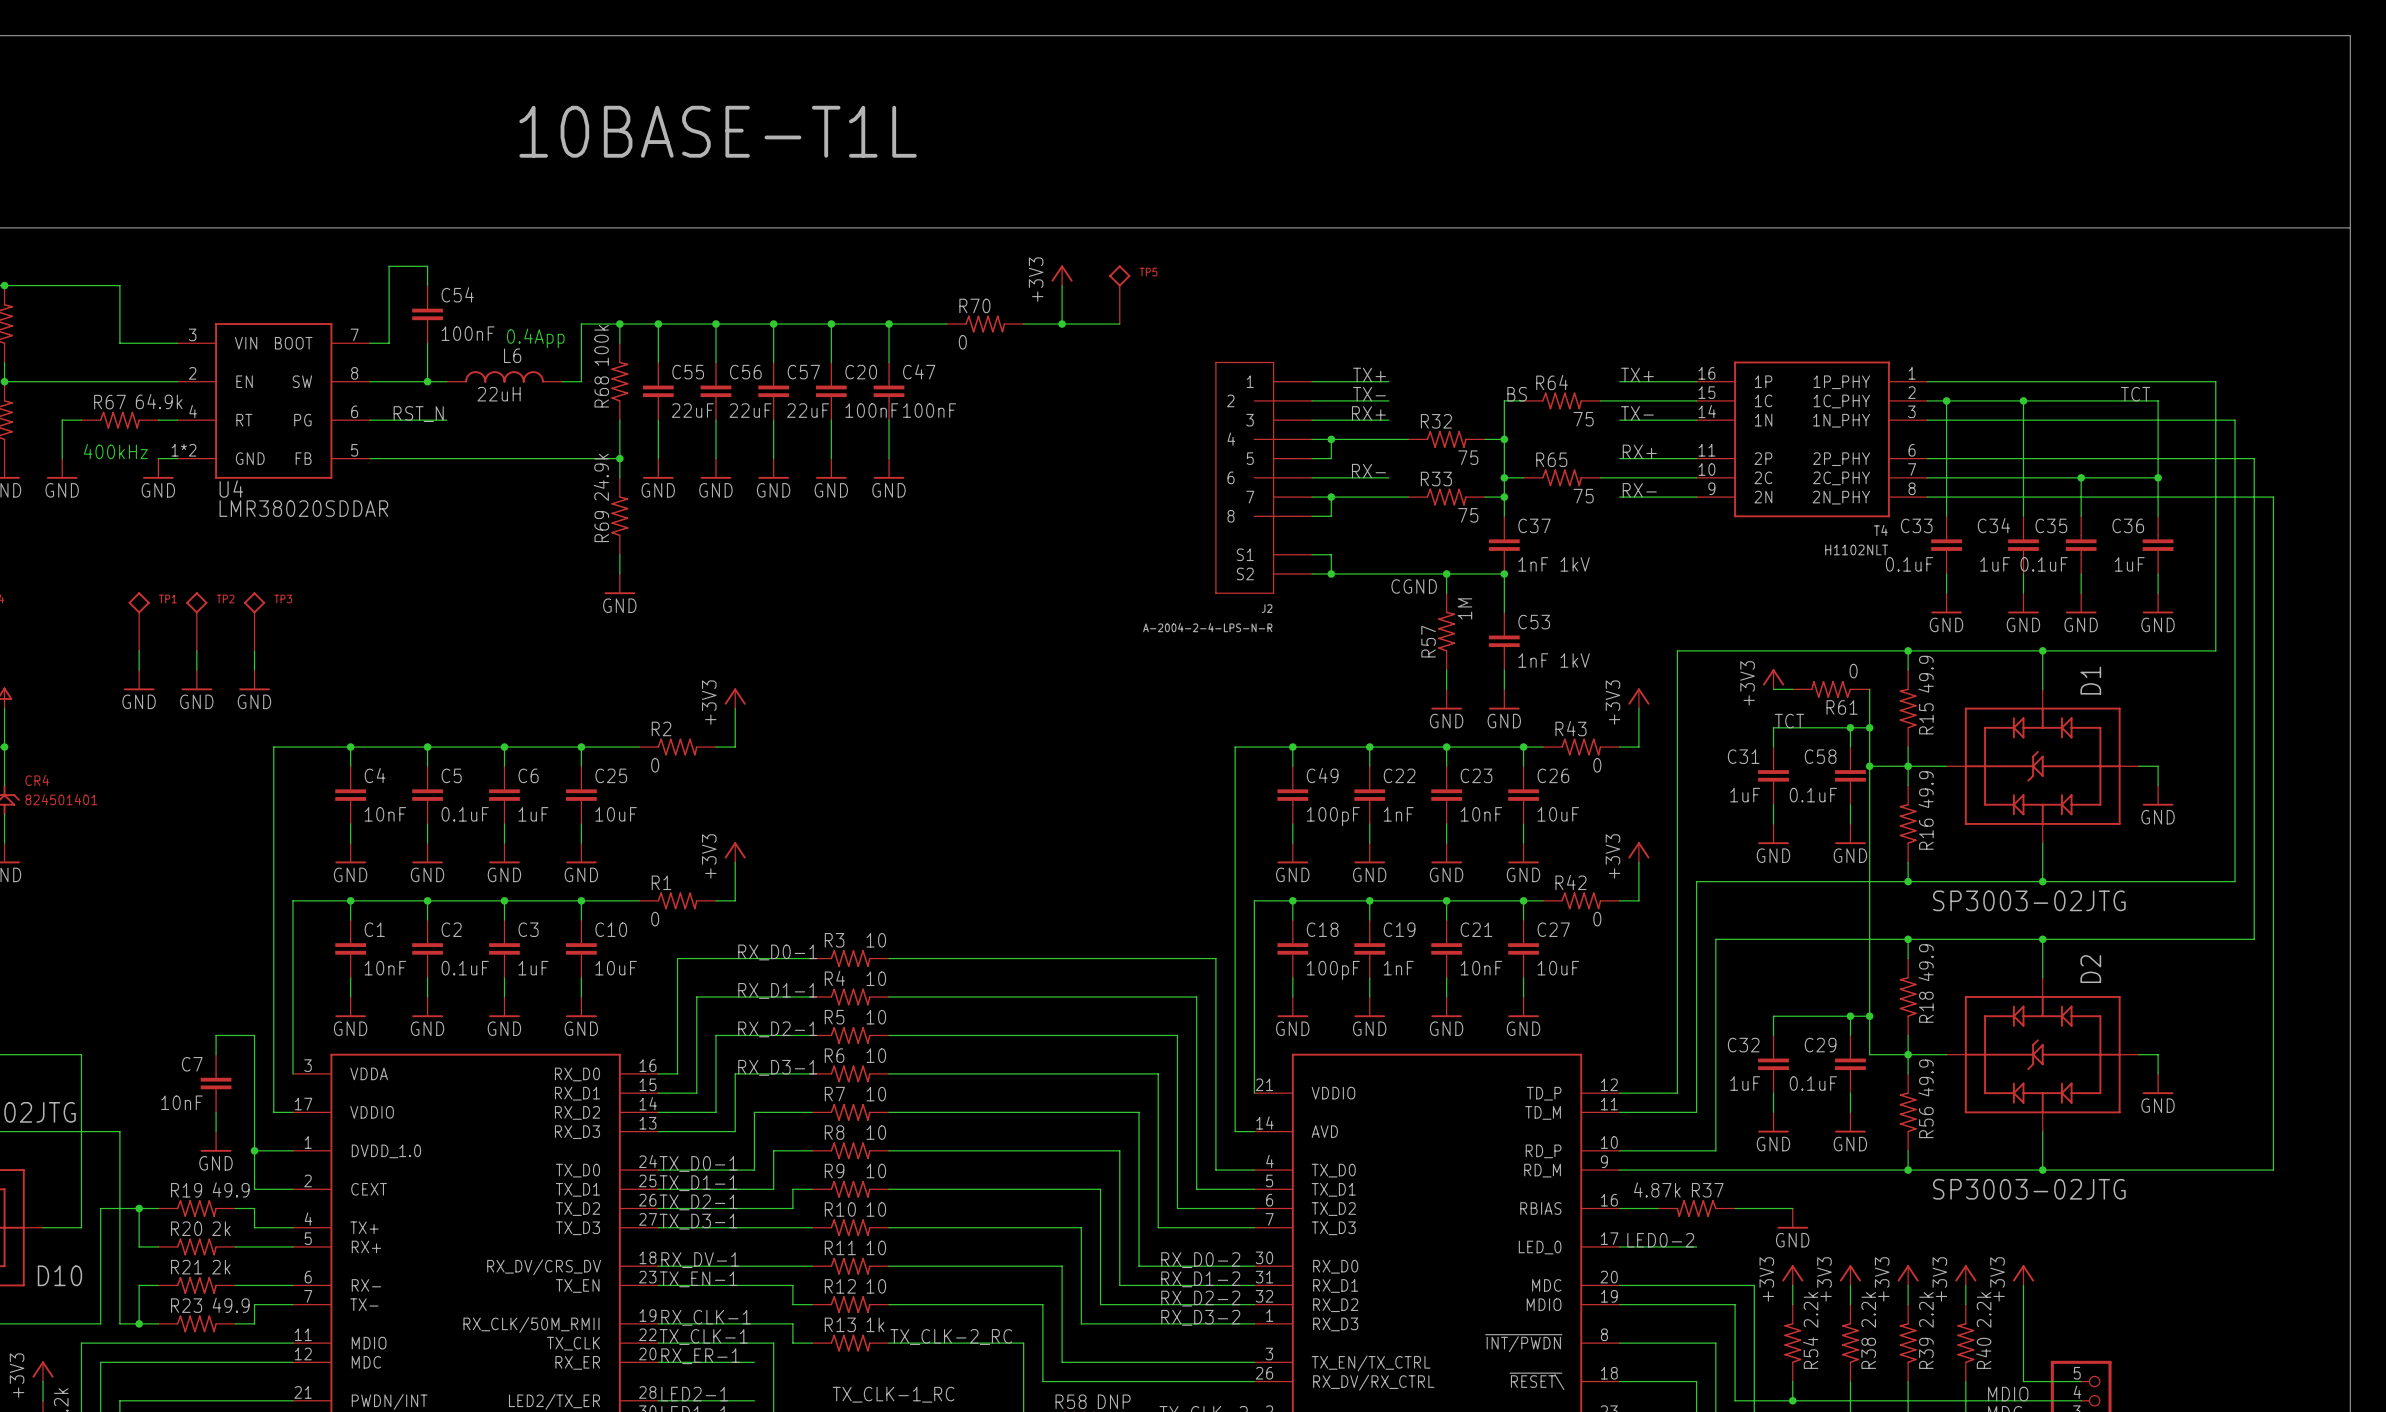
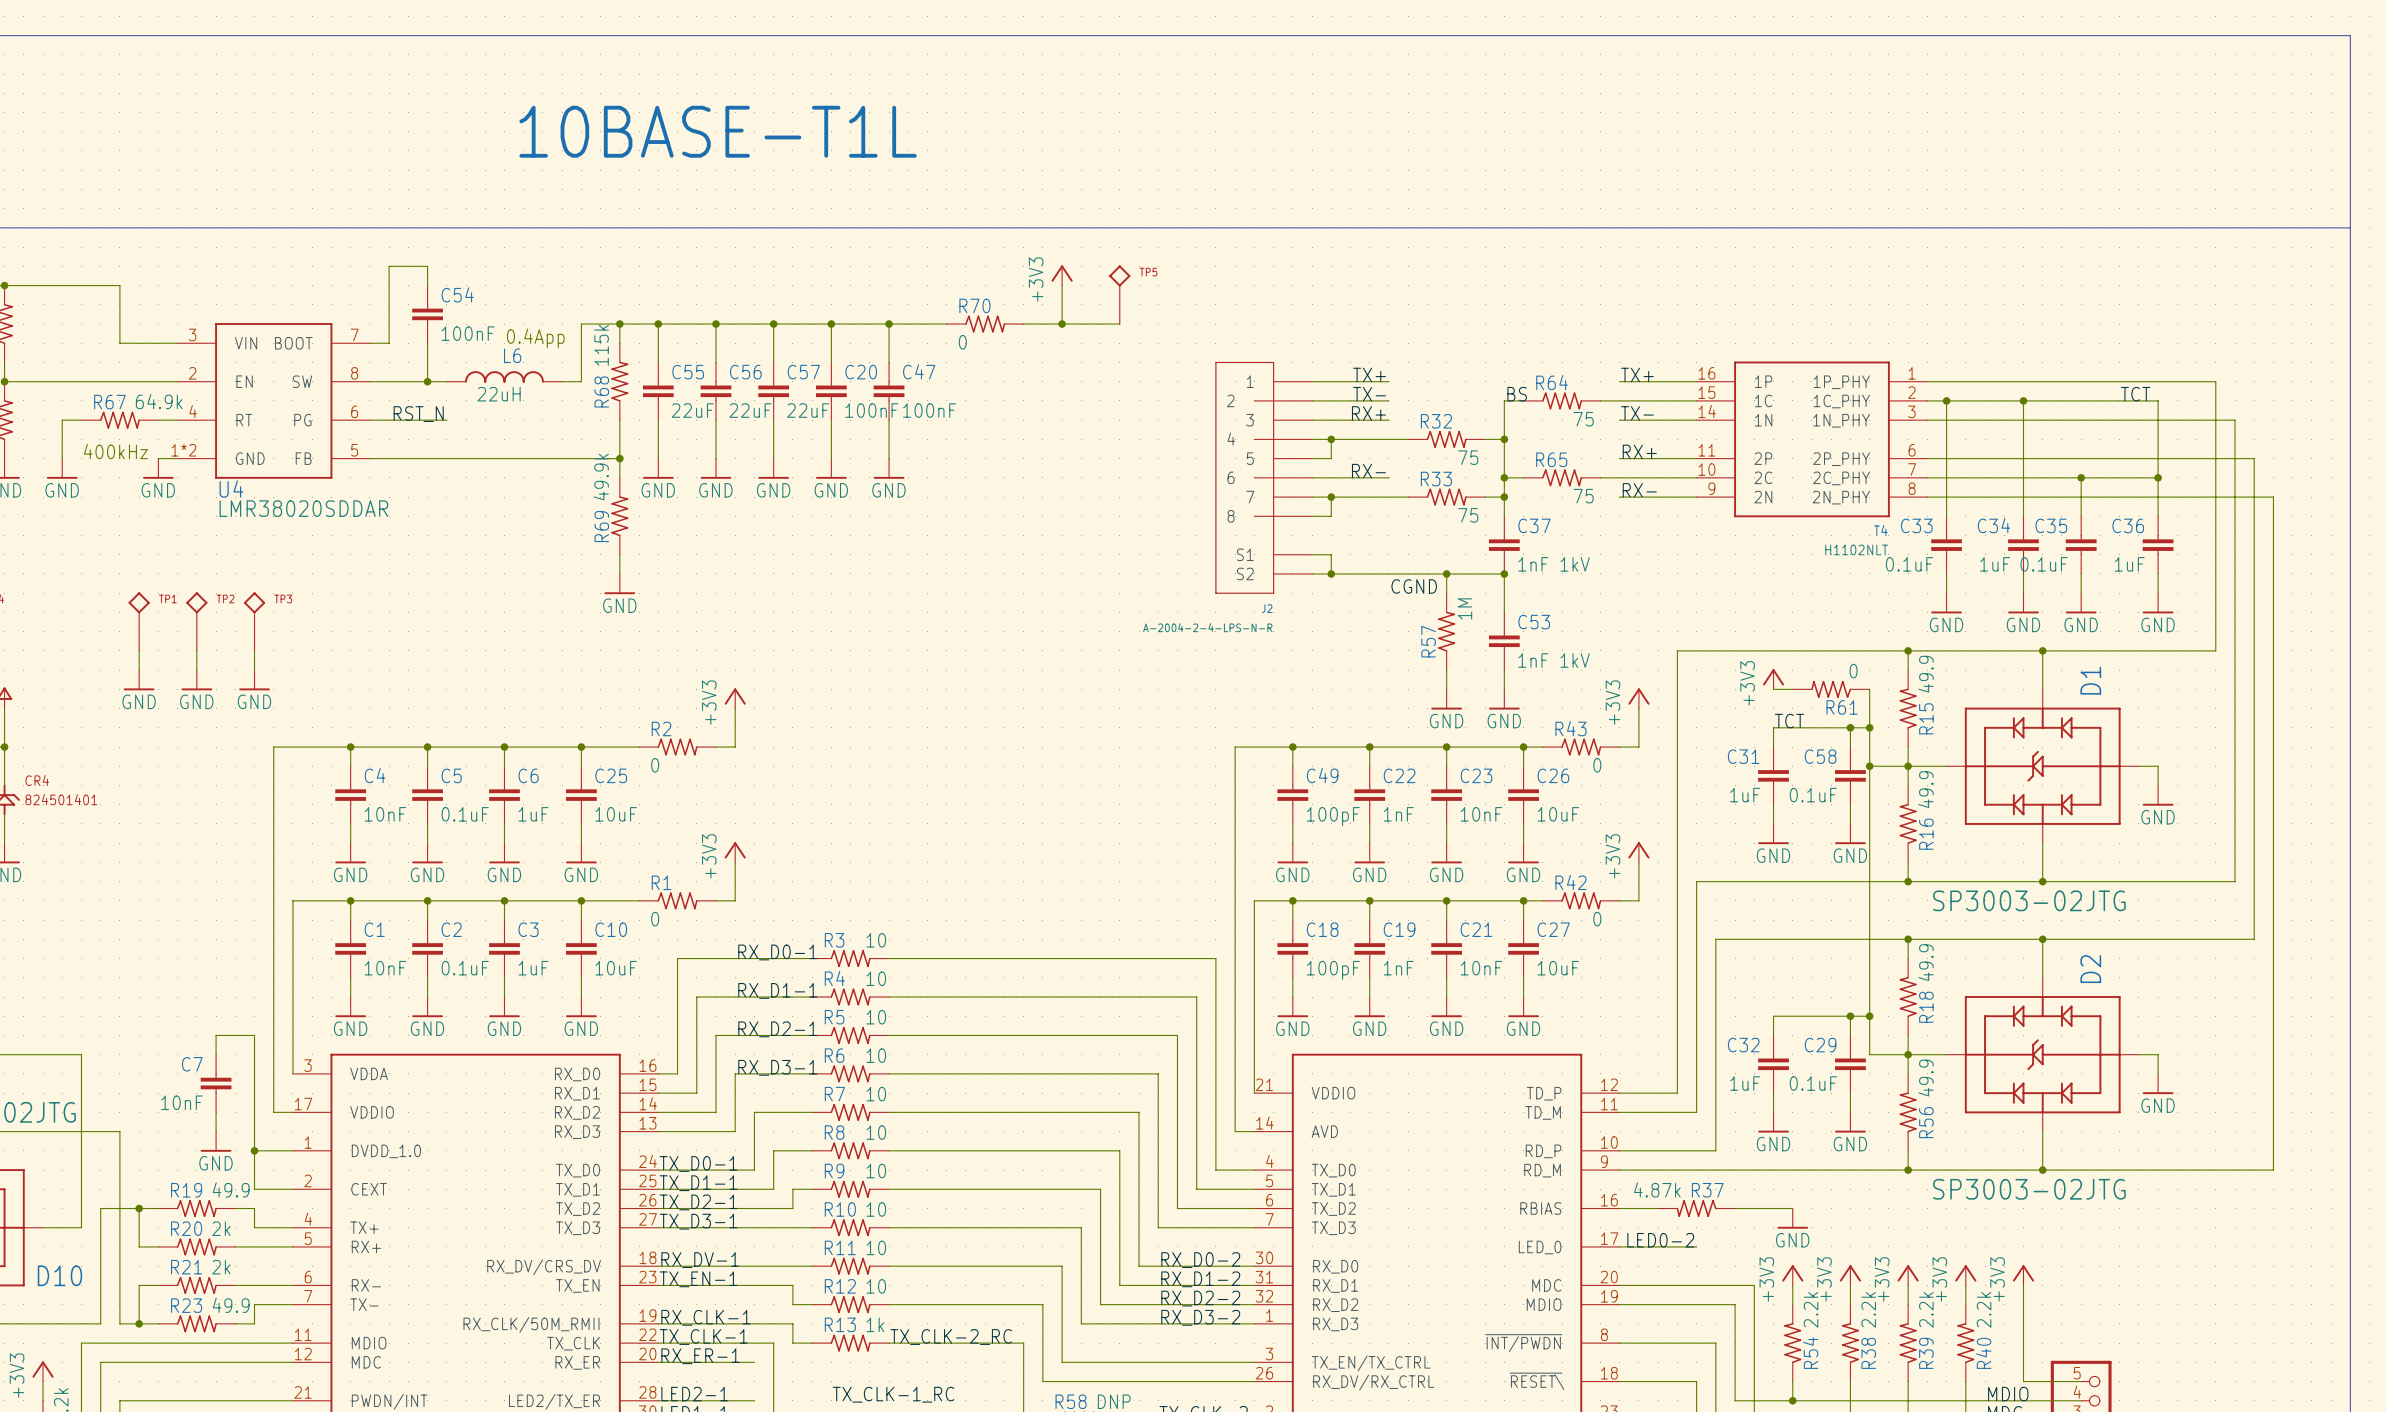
R68 value: 100k (601, 345) -> 115k (601, 345)
R69 value: 24.9k (601, 477) -> 49.9k (601, 477)

